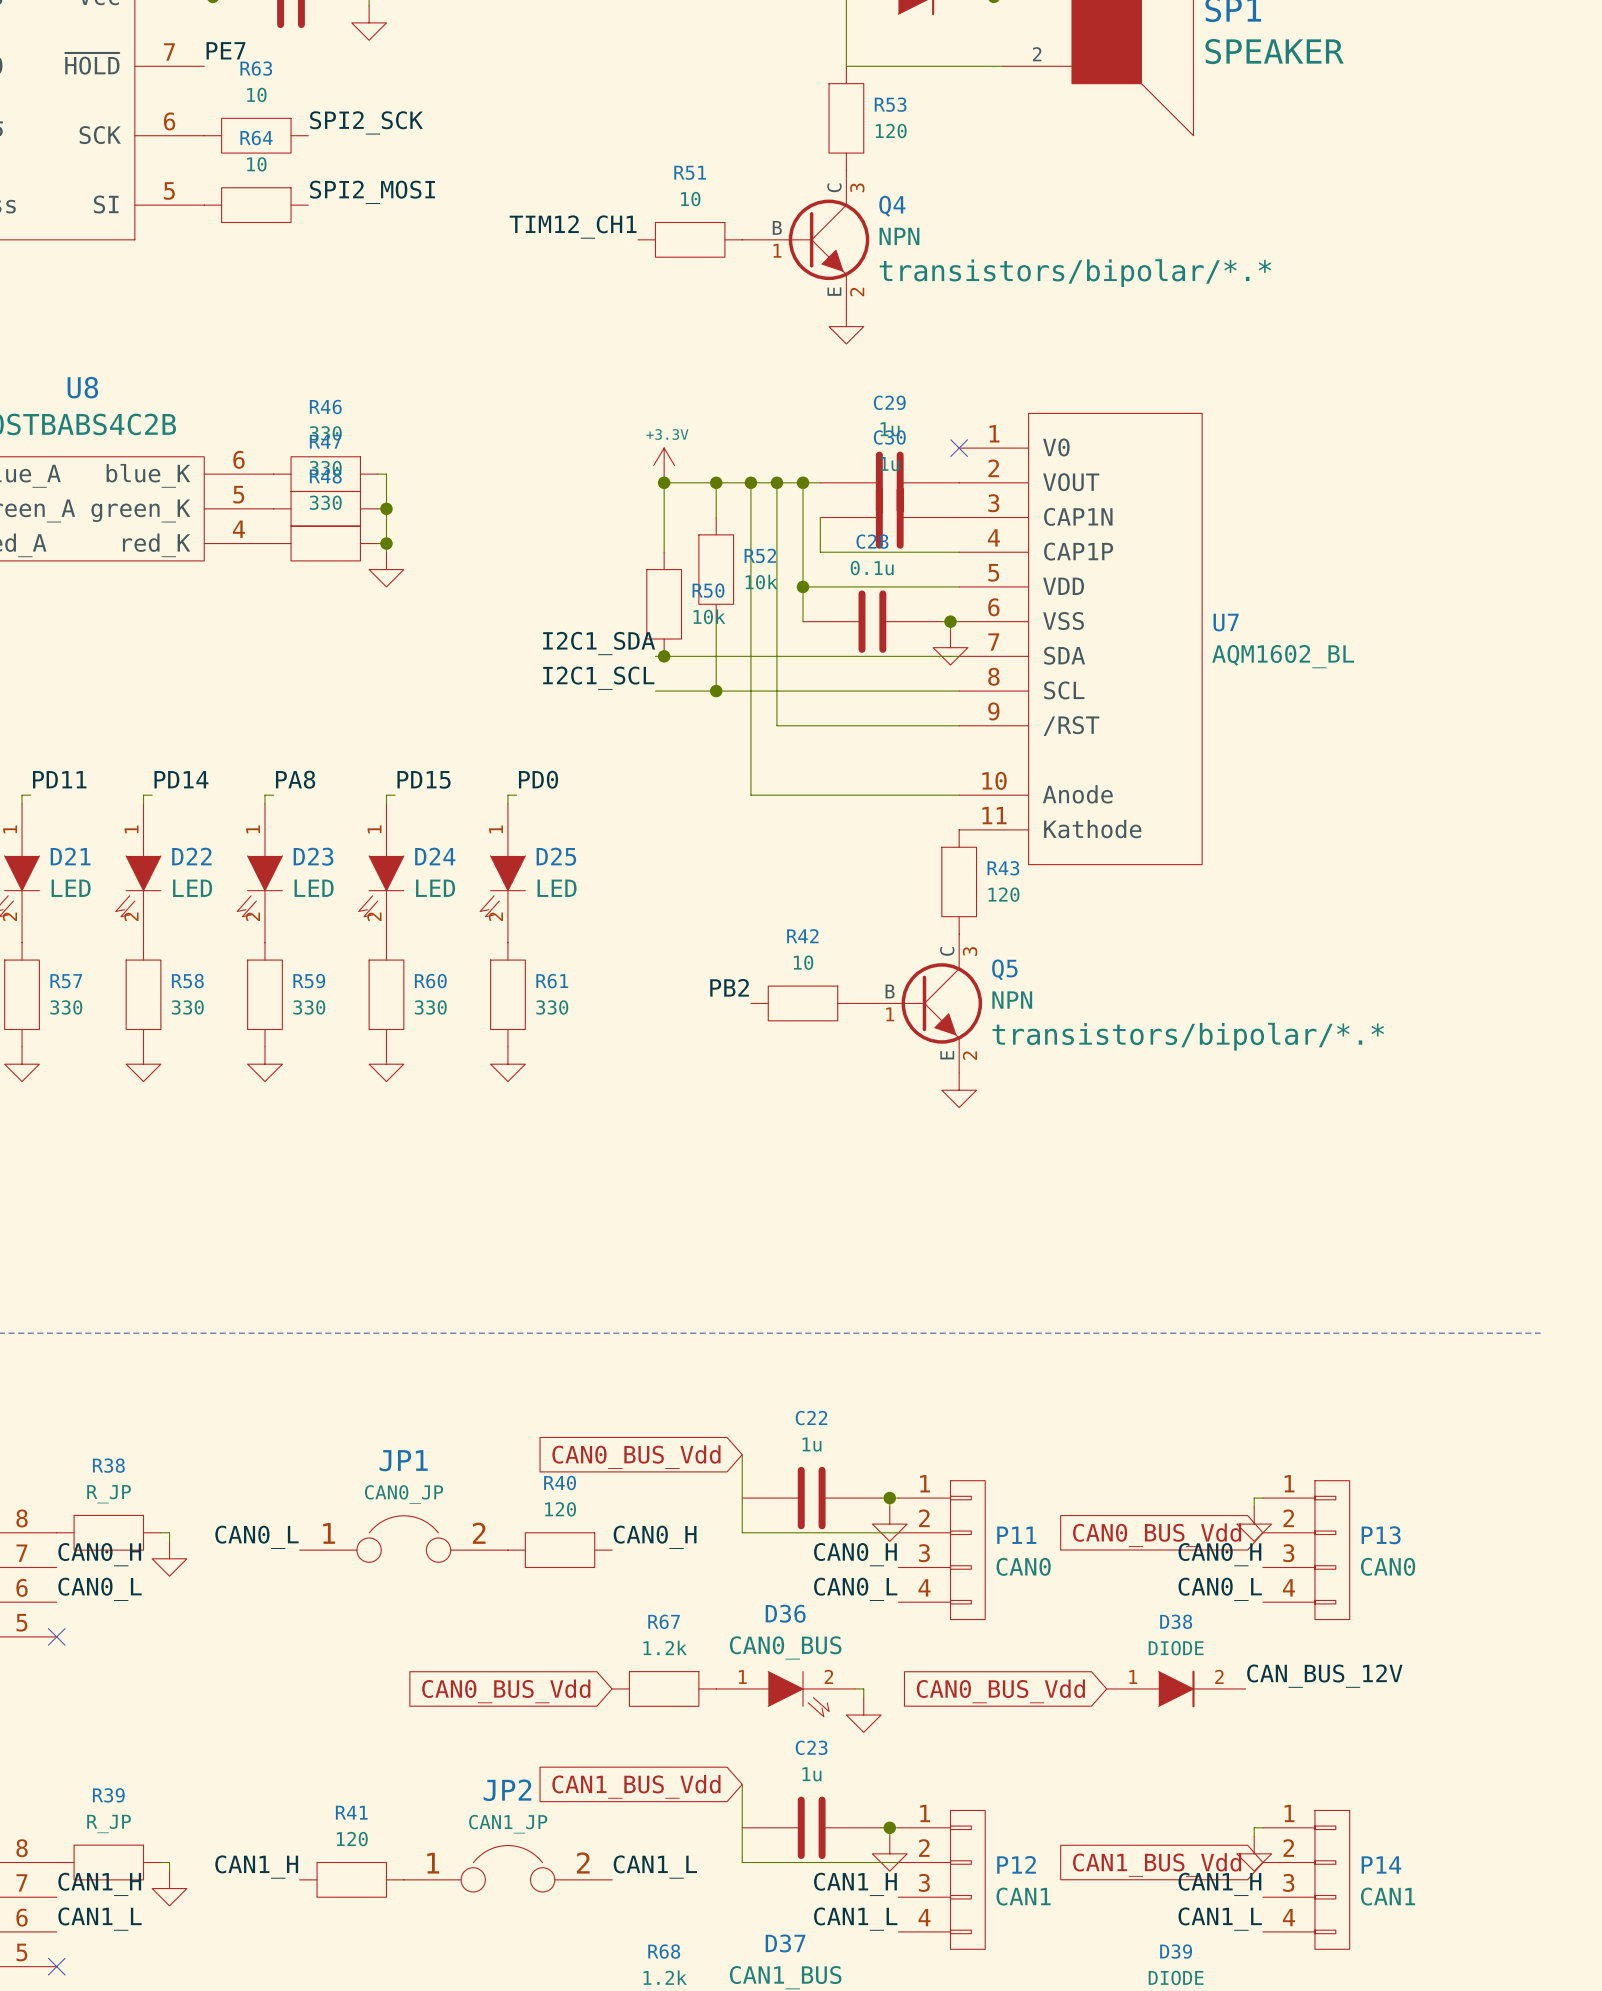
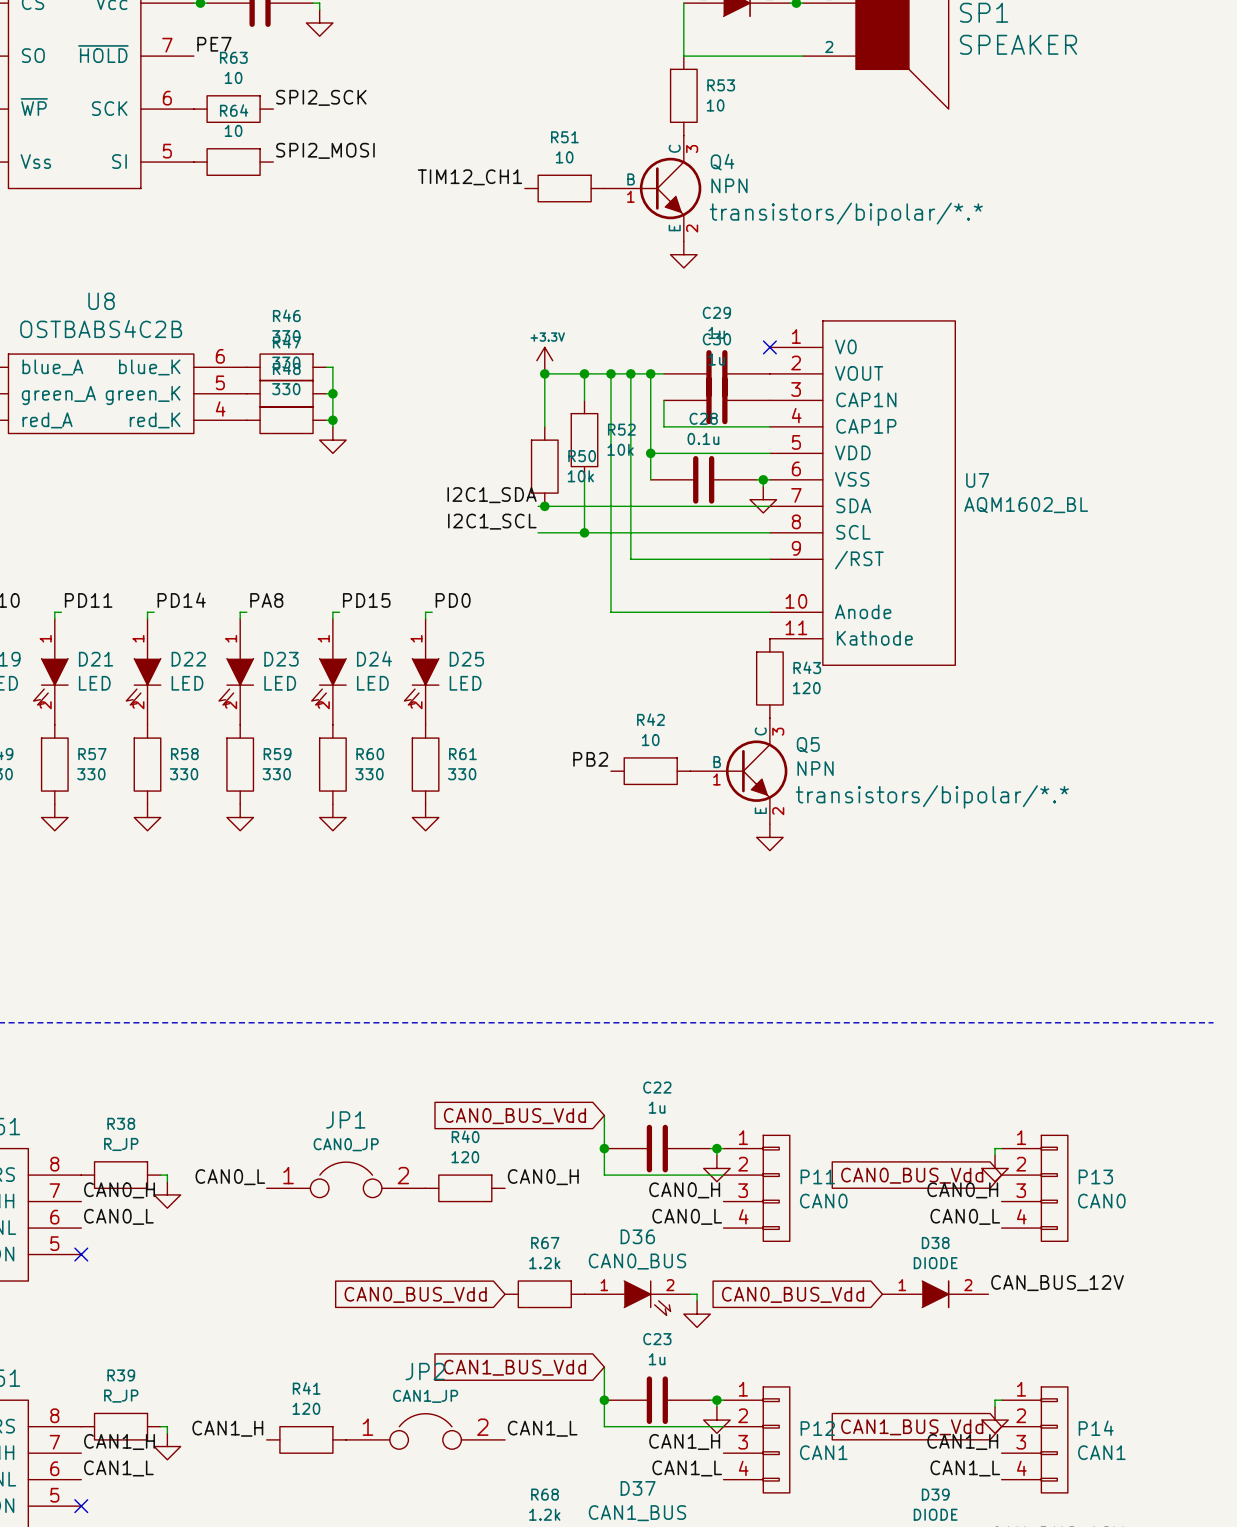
R53 value: 120 (891, 131) -> 10 (715, 105)
junction: none -> (604, 1148)
junction: none -> (604, 1400)

